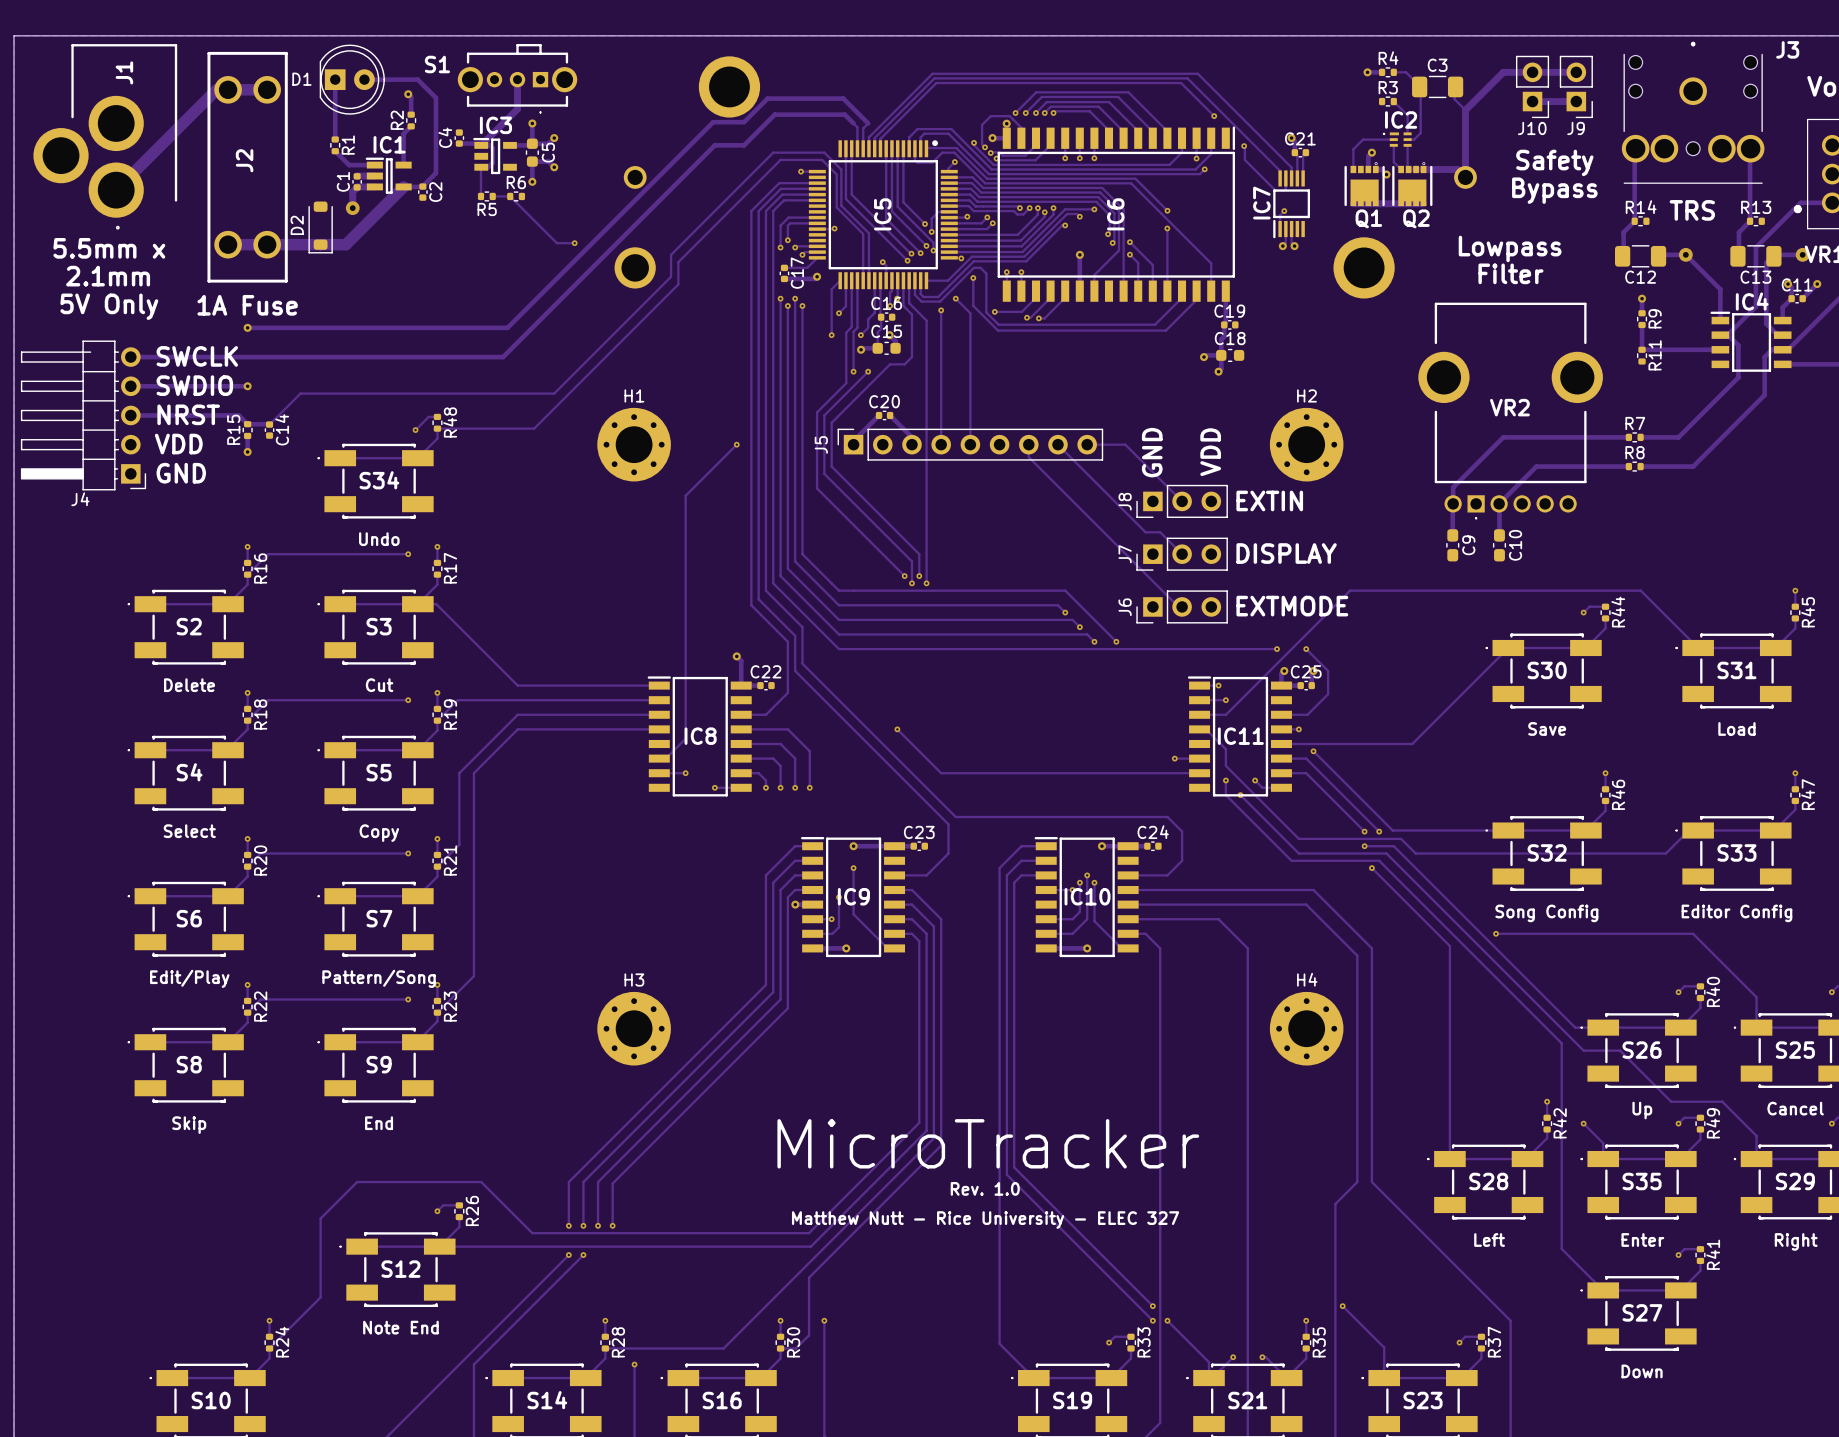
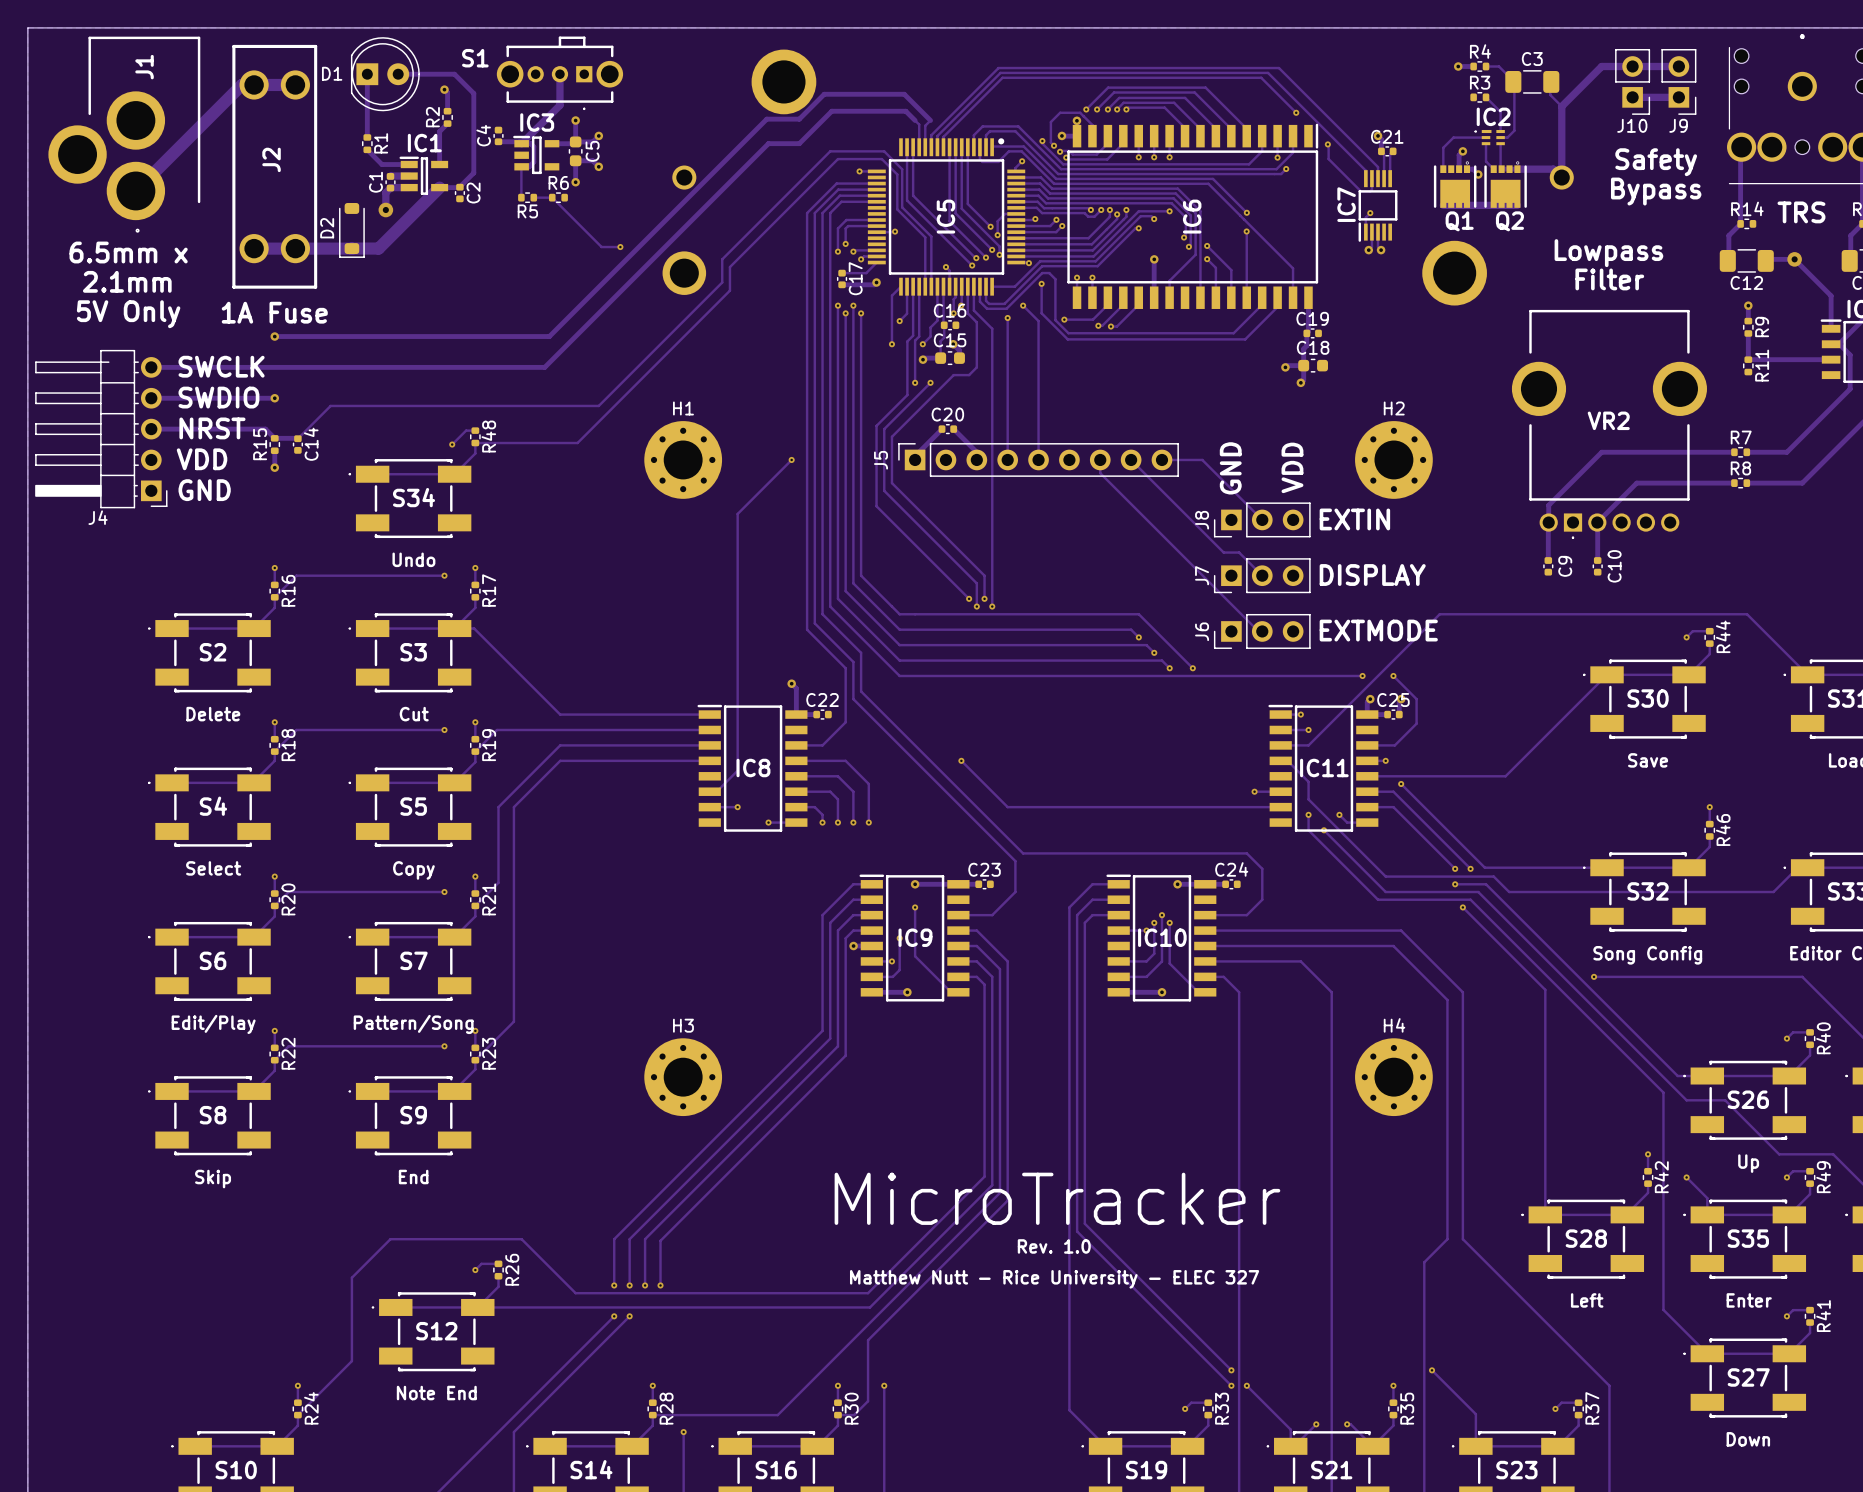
text: 5.5mm x (109, 248) -> 6.5mm x (128, 252)
C9 footprint: [1446, 529, 1460, 562] -> [1543, 557, 1554, 576]
C10 footprint: [1492, 529, 1507, 562] -> [1592, 557, 1603, 576]

